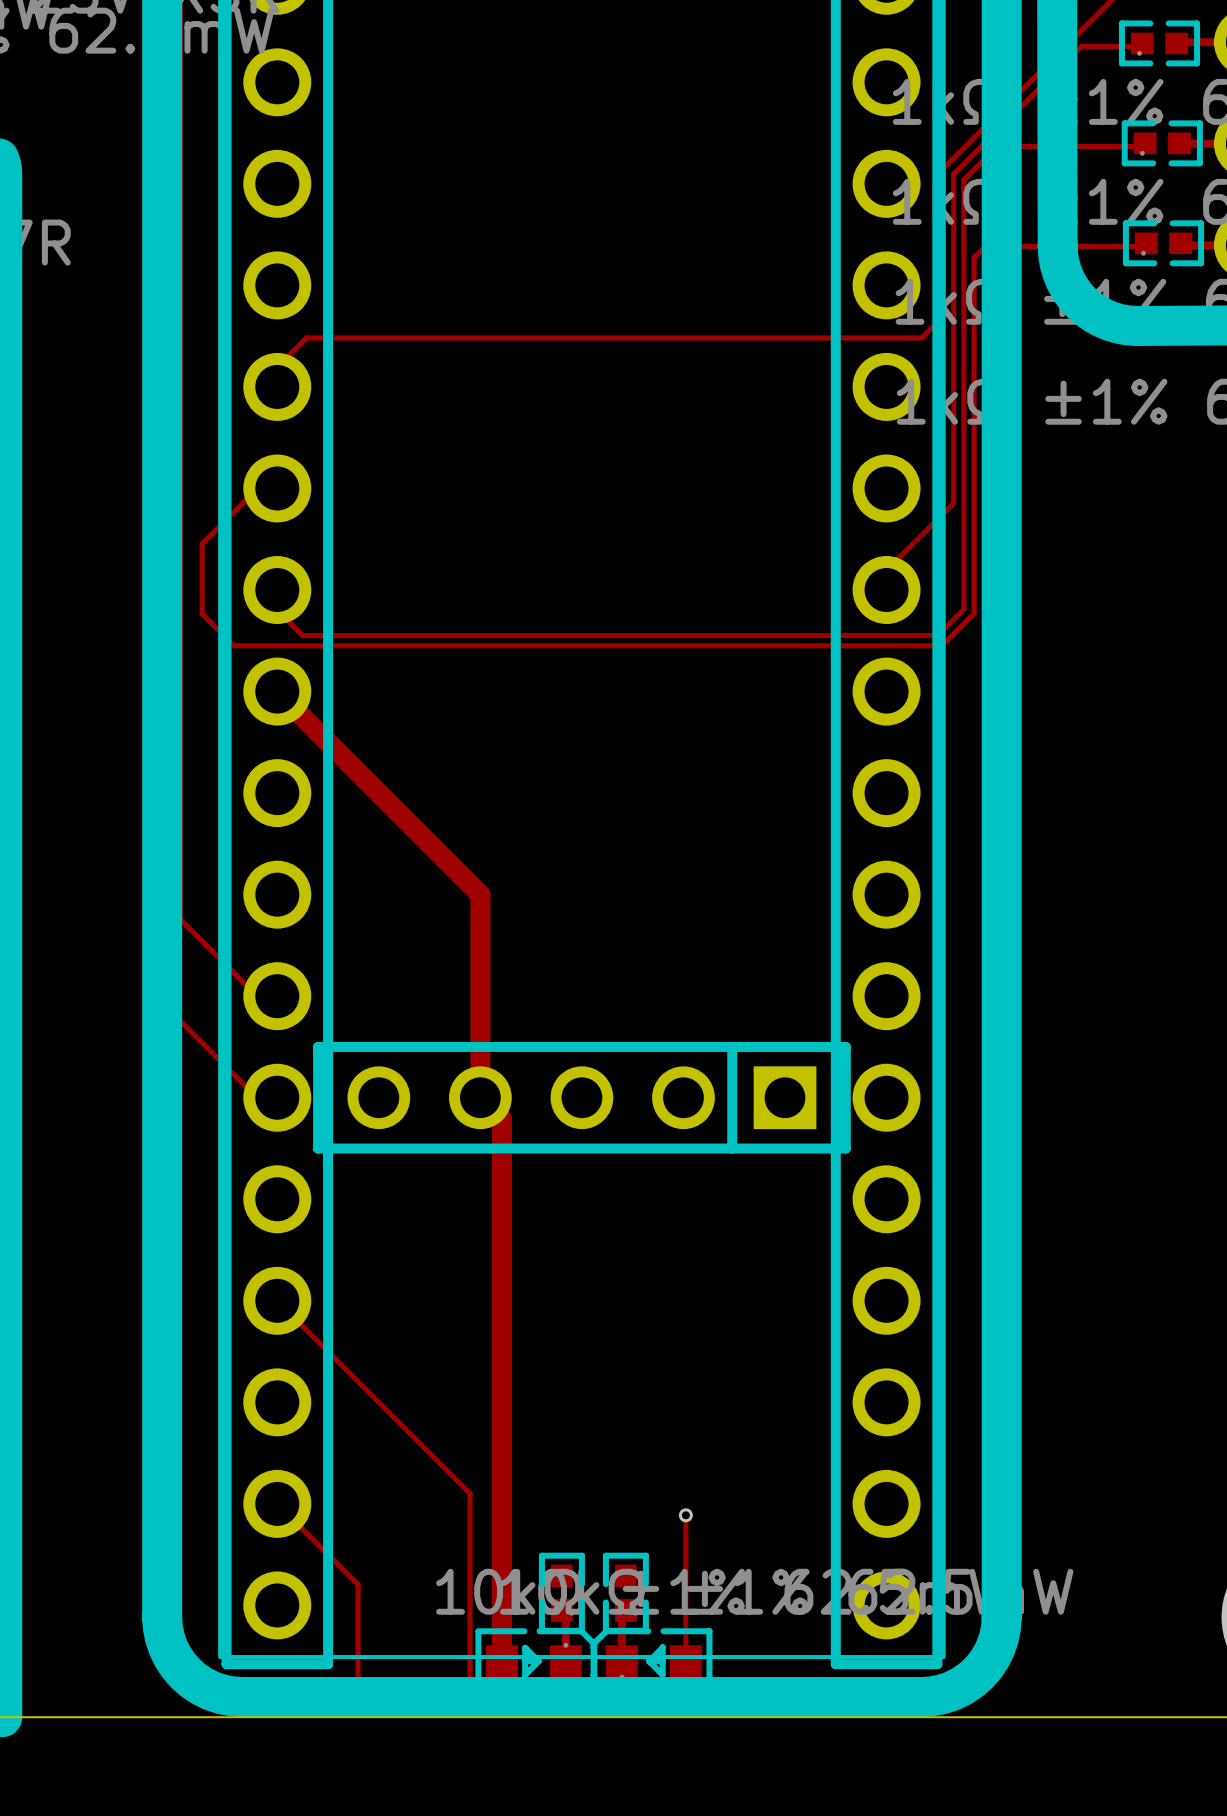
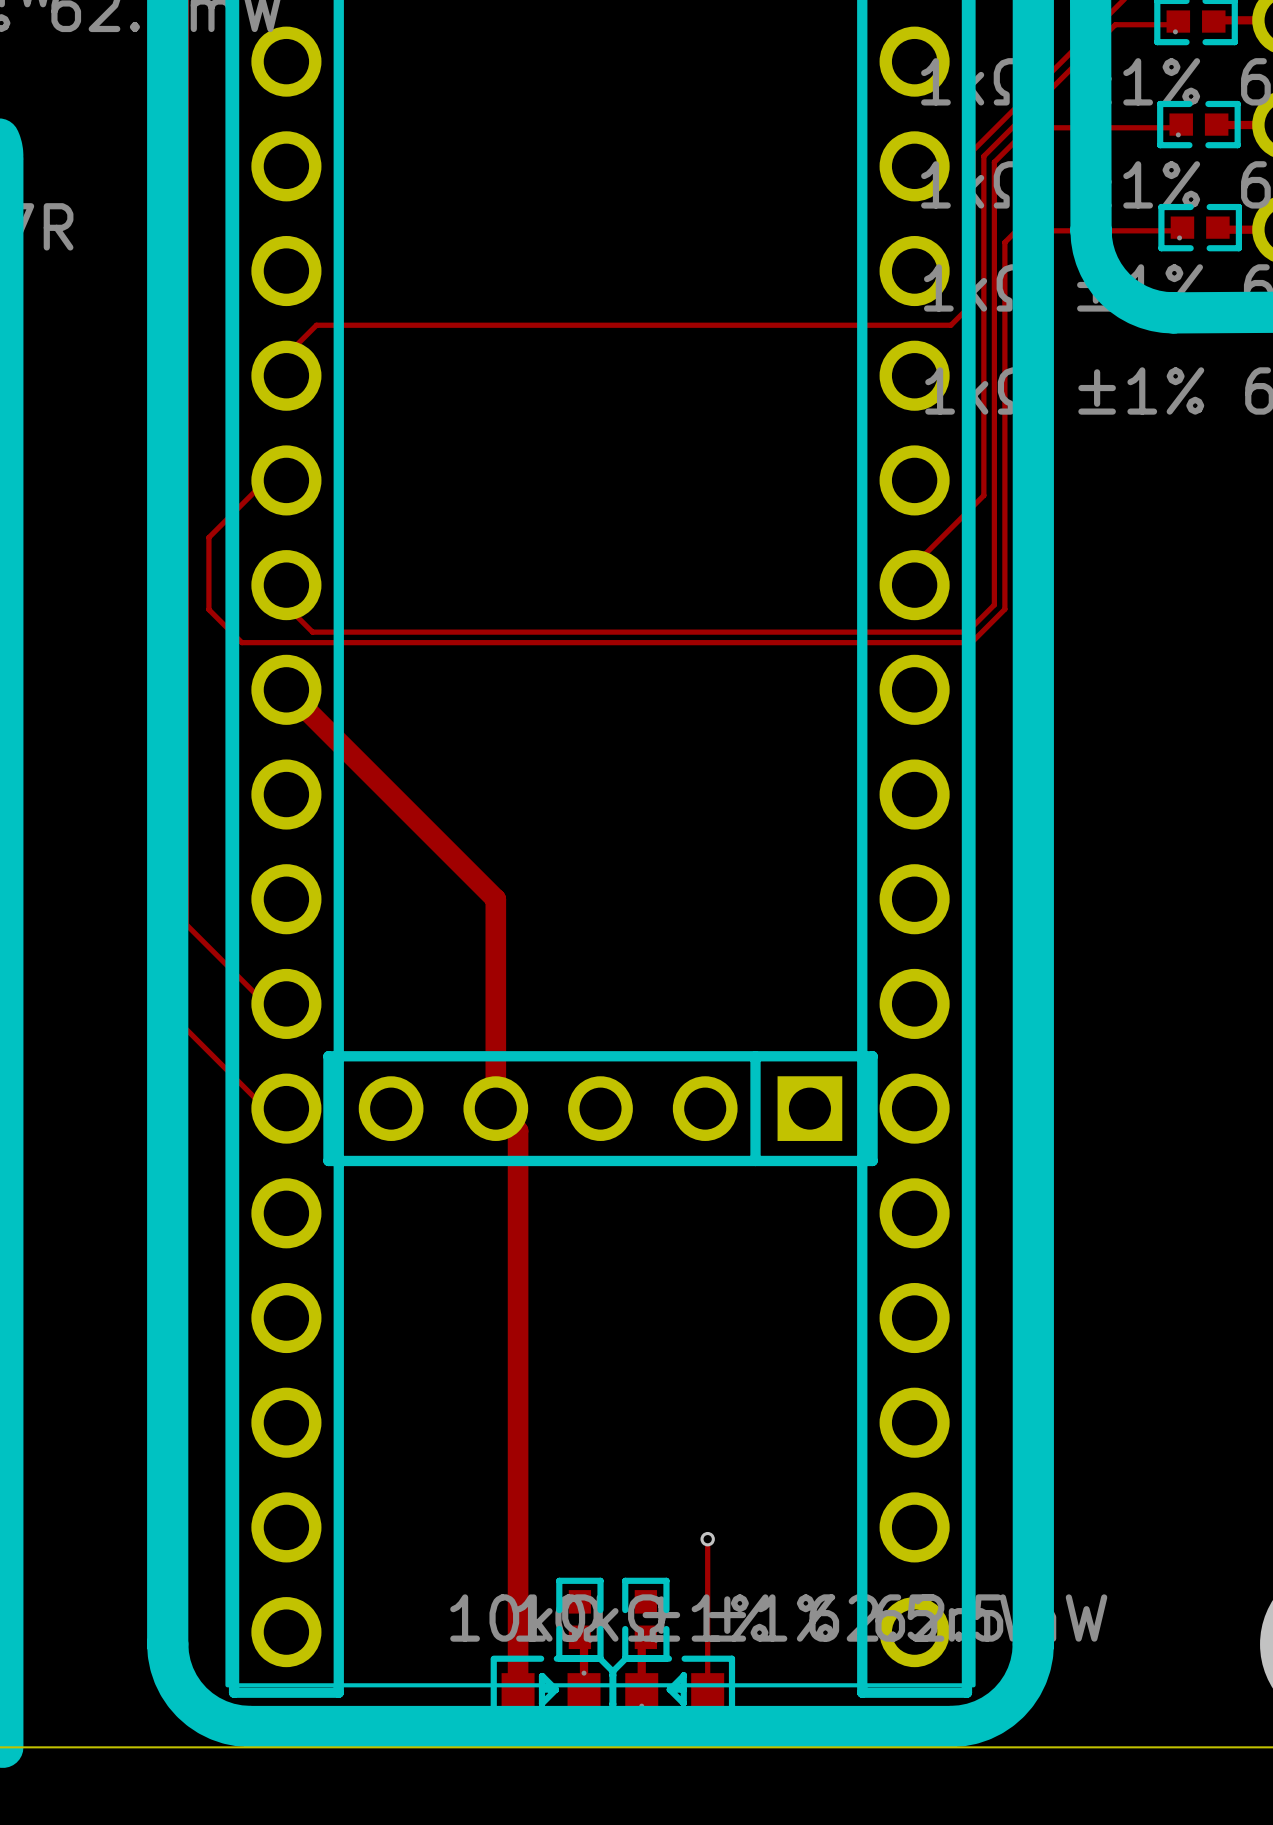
track: (277, 1300) (469, 1493) (469, 1689) -> none
track: (277, 1503) (358, 1584) (358, 1693) -> none

